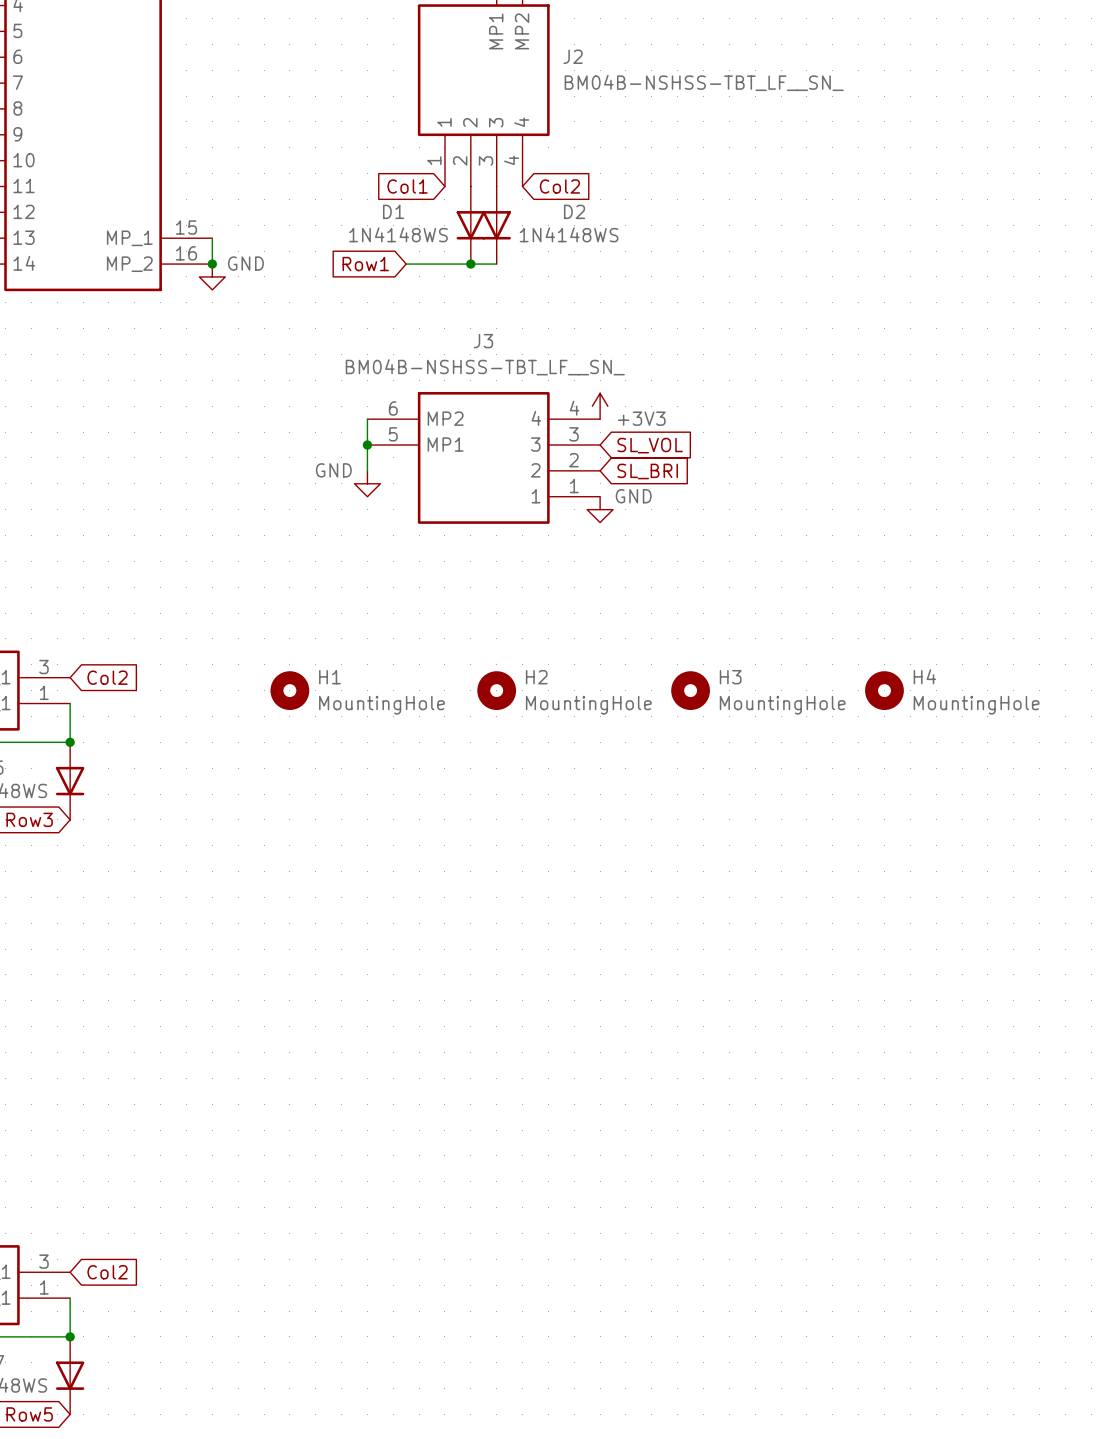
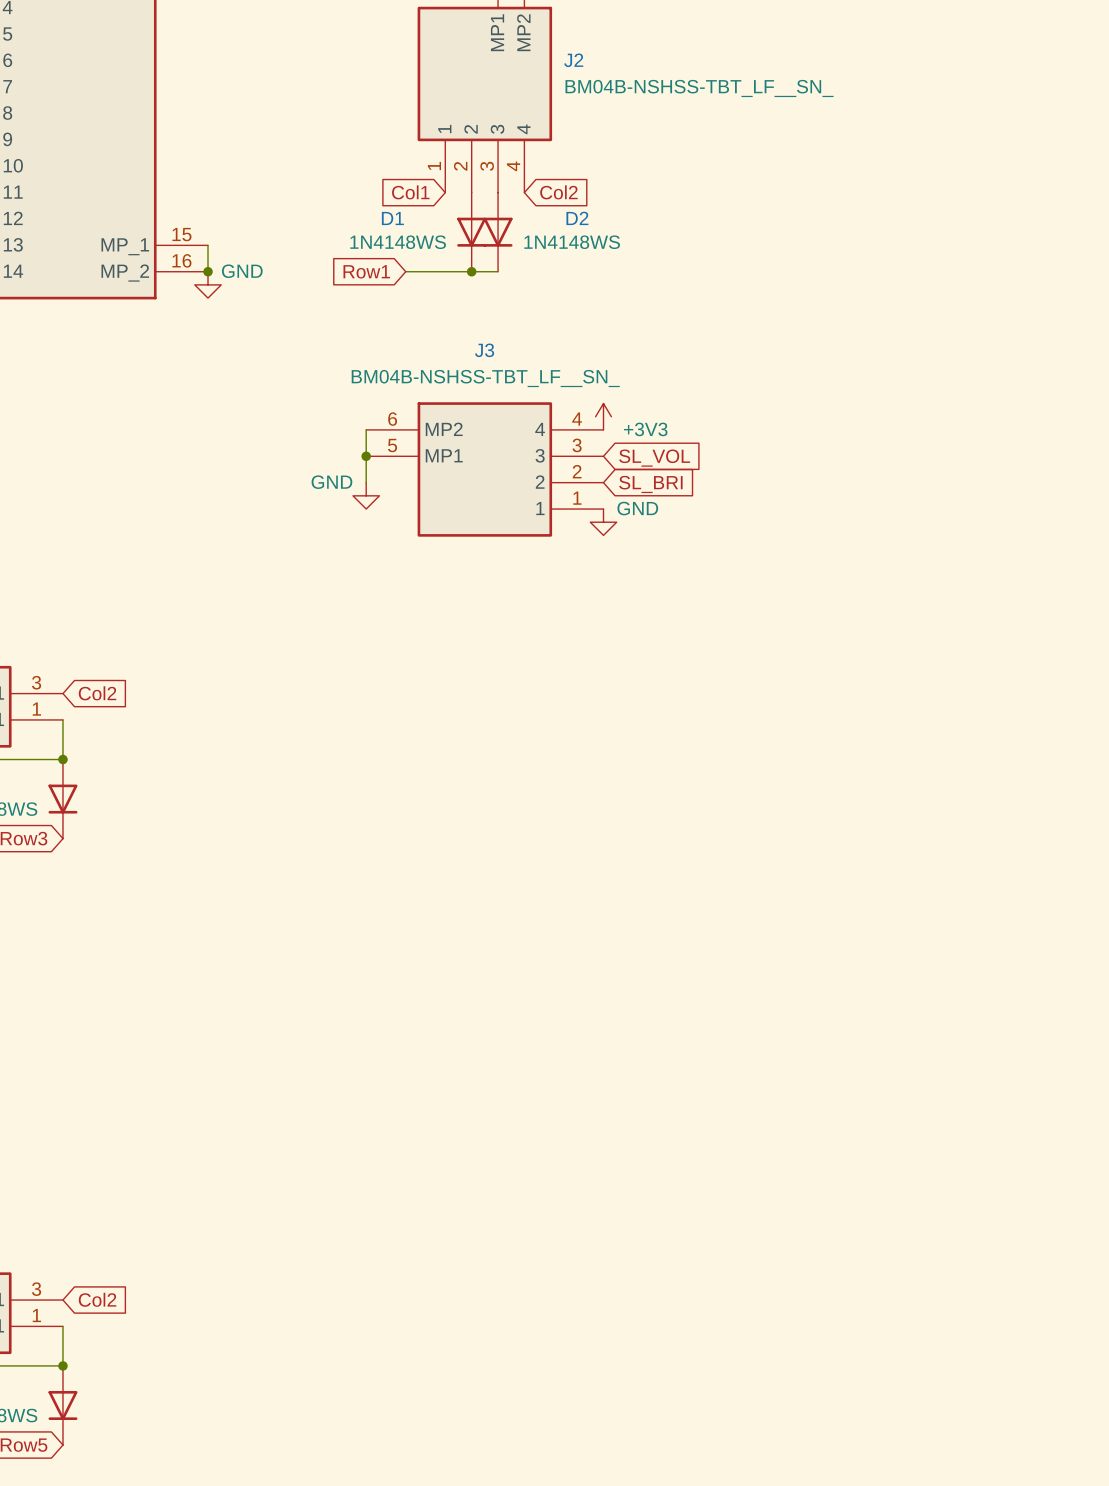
H1: MountingHole (289, 690) -> none
H2: MountingHole (496, 690) -> none
H3: MountingHole (690, 690) -> none
H4: MountingHole (884, 690) -> none

